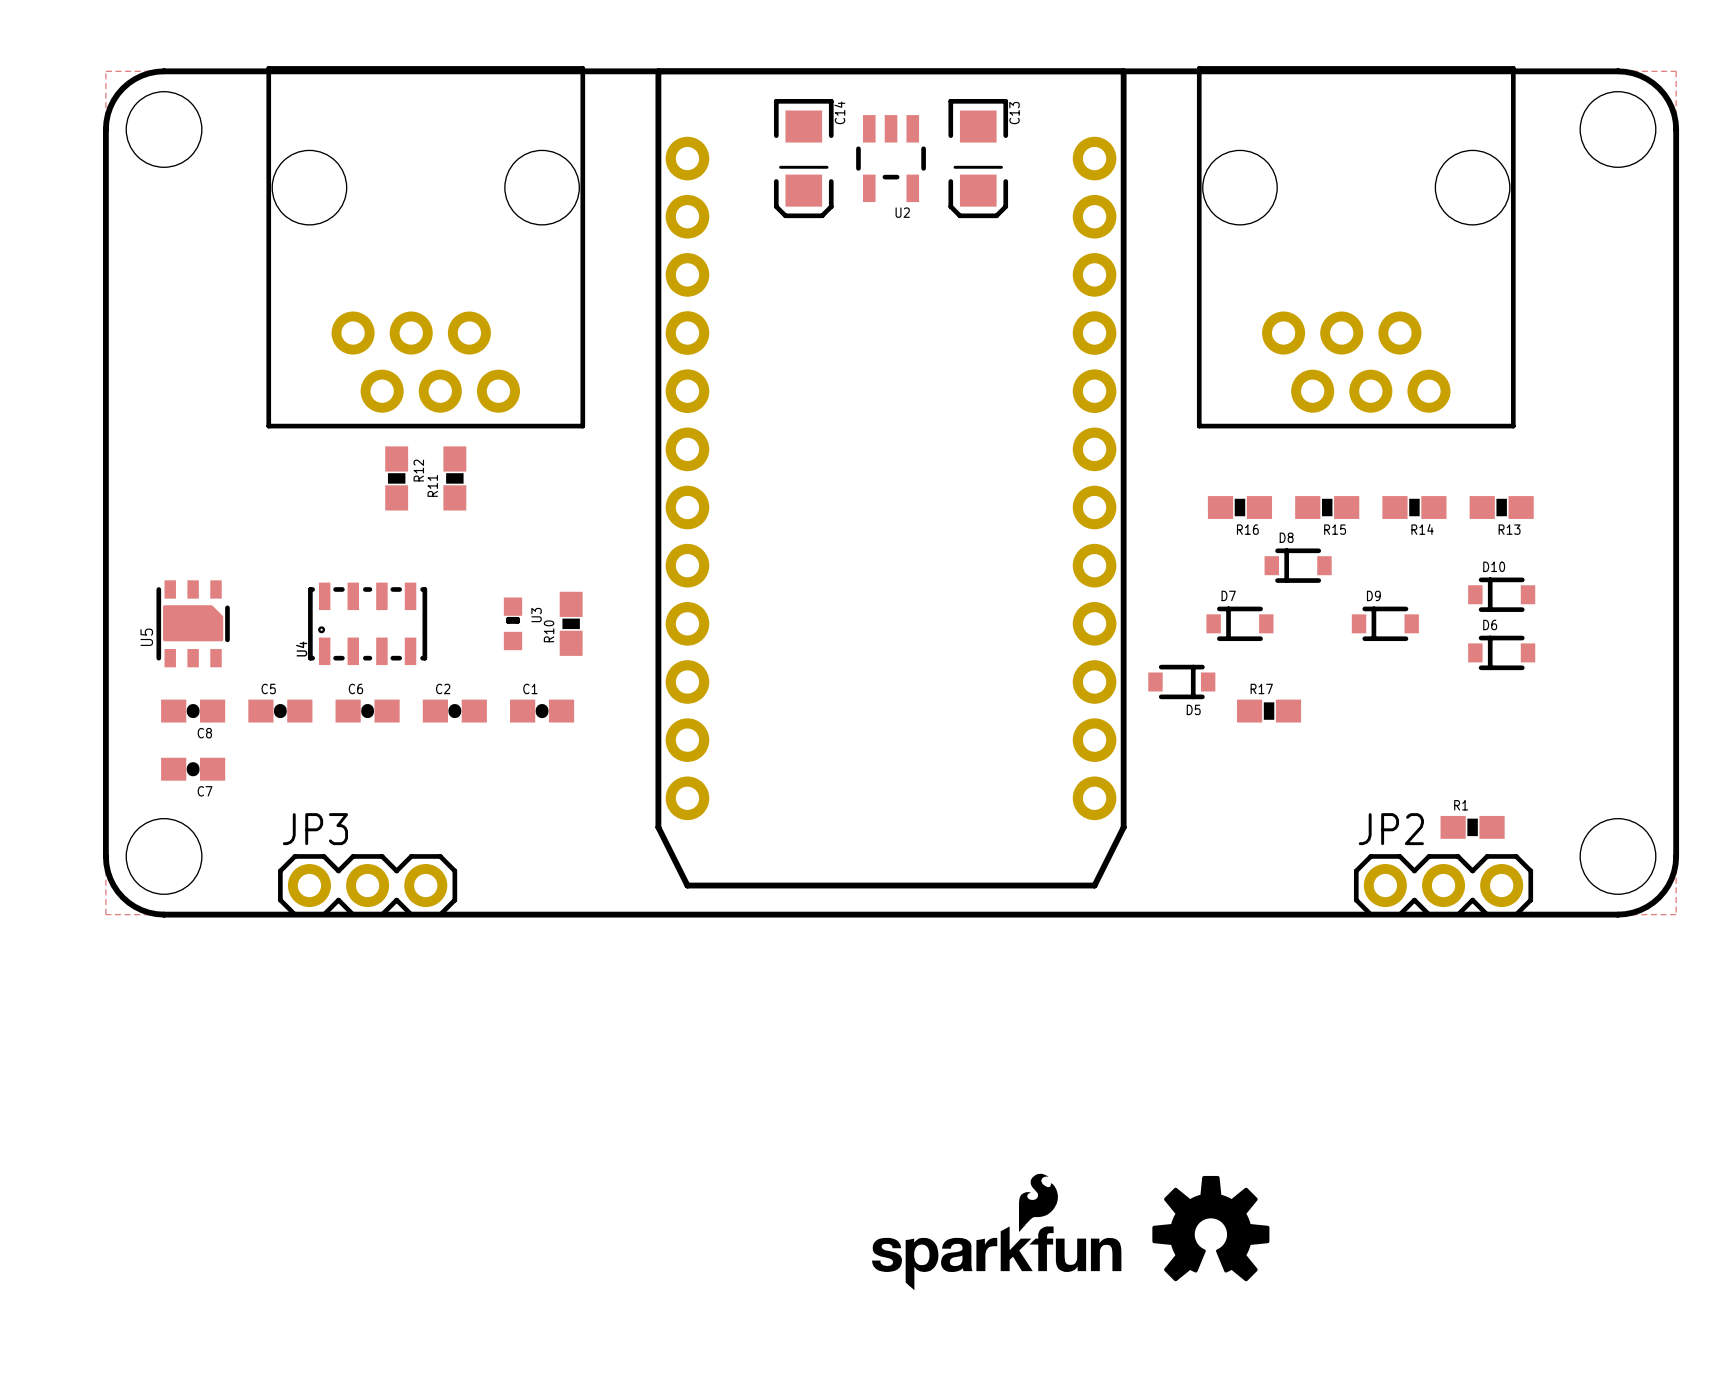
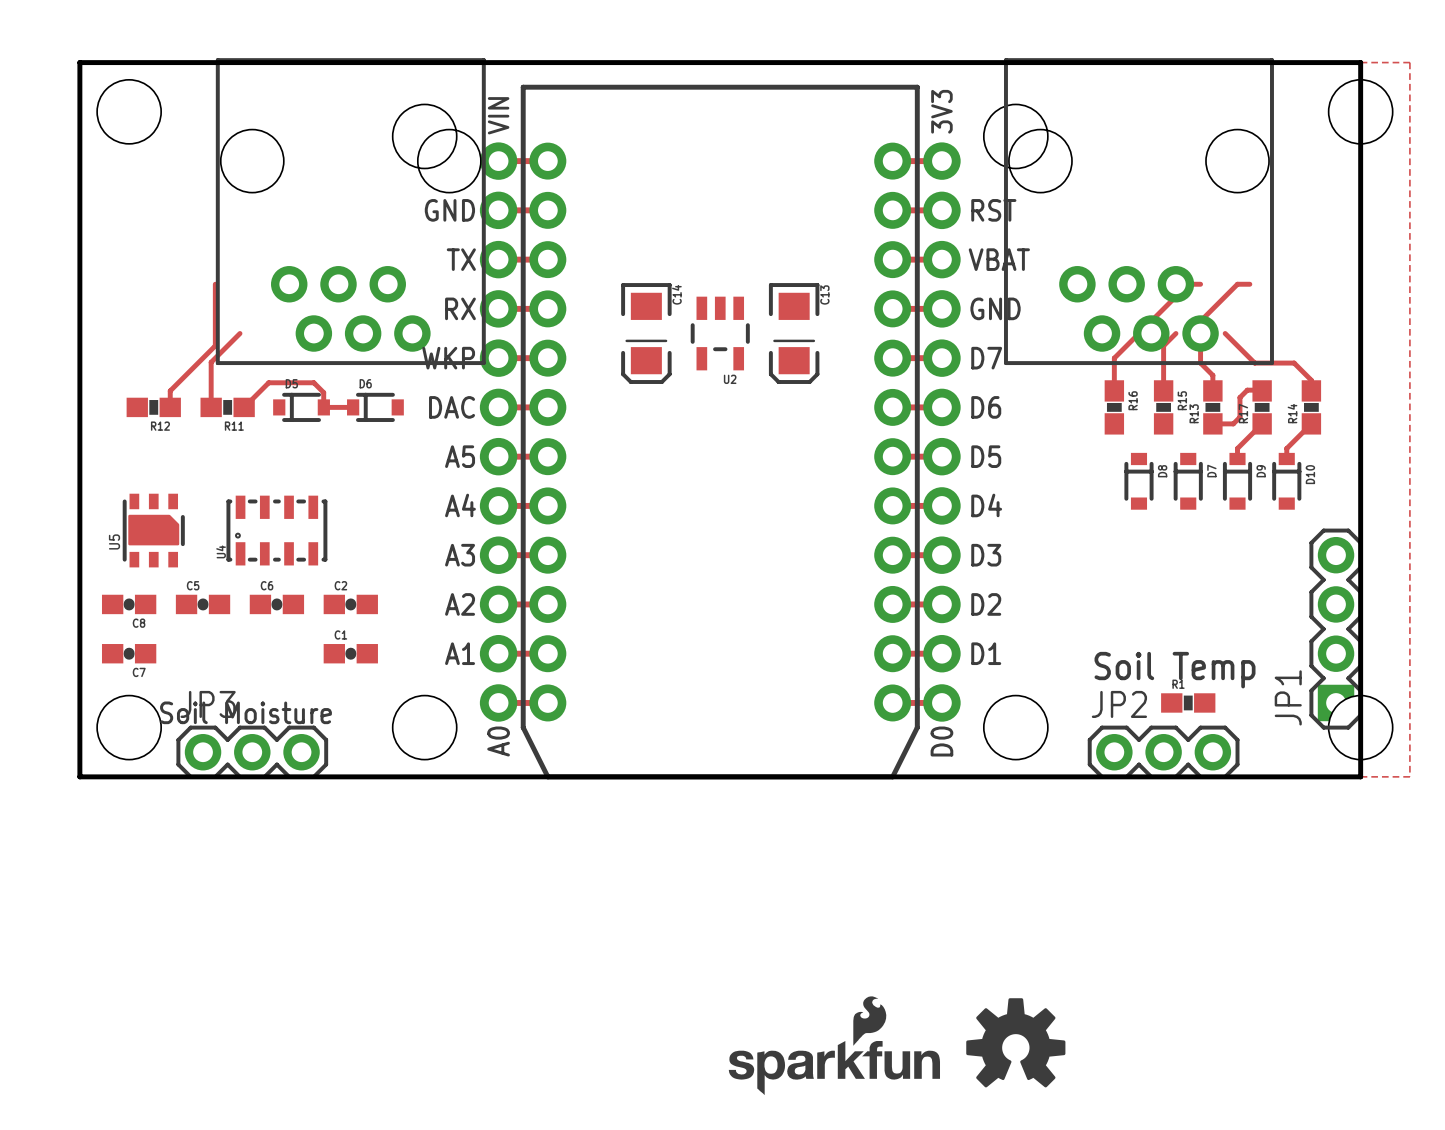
board edge: (164, 71) (141, 75) (122, 88) (110, 107) (105, 129) -> (129, 62) (79, 62) (79, 111)
board edge: (1617, 71) (1640, 75) (1659, 88) (1671, 107) (1676, 129) (1675, 864) (1671, 878) (1659, 897) (1640, 910) (1617, 914) -> (1360, 62) (1360, 776)
C14 position: (803, 158) -> (646, 333)
U2 position: (891, 158) -> (720, 333)
C13 position: (978, 158) -> (794, 333)
track: none -> (215, 284) (215, 345) (170, 390) (170, 407)
track: none -> (1200, 284) (1188, 284) (1114, 358) (1114, 390)
track: none -> (1249, 284) (1237, 284) (1200, 321) (1200, 363) (1212, 375) (1212, 390)
track: none -> (239, 333) (211, 362) (211, 407)
track: none -> (1175, 333) (1163, 345) (1163, 390)
track: none -> (1225, 333) (1254, 363) (1294, 363) (1311, 380) (1311, 390)
track: none -> (1262, 390) (1247, 390) (1239, 397) (1239, 417) (1233, 423) (1212, 423)
track: none -> (323, 407) (323, 392) (313, 382) (268, 382) (244, 407)
track: none -> (323, 407) (353, 407)
R12 rotation: 0° (396, 478) -> 90° clockwise (153, 407)
R12 position: (396, 478) -> (153, 407)
R11 rotation: 0° (454, 478) -> 90° clockwise (227, 407)
R11 position: (454, 478) -> (227, 407)
part: (891, 478) -> none
track: none -> (1262, 423) (1237, 448) (1237, 458)
track: none -> (1311, 423) (1286, 448) (1286, 458)
part: none -> (720, 432)
R16 rotation: 0° (1239, 507) -> 90° clockwise (1114, 407)
R16 position: (1239, 507) -> (1114, 407)
R15 rotation: 0° (1327, 507) -> 90° clockwise (1163, 407)
R15 position: (1327, 507) -> (1163, 407)
R14 rotation: 0° (1414, 507) -> 90° clockwise (1311, 407)
R14 position: (1414, 507) -> (1311, 407)
R13 rotation: 0° (1501, 507) -> 90° clockwise (1212, 407)
R13 position: (1501, 507) -> (1212, 407)
D8 rotation: 0° (1298, 565) -> 90° clockwise (1138, 481)
D8 position: (1298, 565) -> (1138, 481)
D10 rotation: 0° (1501, 594) -> 90° clockwise (1286, 481)
D10 position: (1501, 594) -> (1286, 481)
U4 position: (367, 623) -> (276, 530)
U3: (513, 623) -> none
R10: (571, 623) -> none
D7 rotation: 0° (1239, 623) -> 90° clockwise (1188, 481)
D7 position: (1239, 623) -> (1188, 481)
D9 rotation: 0° (1385, 623) -> 90° clockwise (1237, 481)
D9 position: (1385, 623) -> (1237, 481)
D6 position: (1501, 652) -> (375, 407)
D5 rotation: 0° (1181, 681) -> 180° (301, 407)
D5 position: (1181, 681) -> (301, 407)
C8 position: (193, 711) -> (129, 604)
C5 position: (280, 711) -> (203, 604)
C6 position: (367, 711) -> (276, 604)
C2 position: (454, 711) -> (350, 604)
C1 position: (542, 711) -> (350, 653)
R17 rotation: 0° (1269, 711) -> 90° clockwise (1262, 407)
R17 position: (1269, 711) -> (1262, 407)
JP1: none -> (1336, 629)
C7 position: (193, 769) -> (129, 653)
text: none -> Soil Temp (1175, 670)
R1 position: (1472, 827) -> (1188, 702)
text: none -> Soil Moisture (245, 712)
board edge: (105, 856) (110, 878) (122, 897) (141, 910) (164, 914) -> (79, 727) (79, 776) (129, 776)
JP3 position: (367, 885) -> (252, 752)
JP2 position: (1443, 885) -> (1163, 752)

